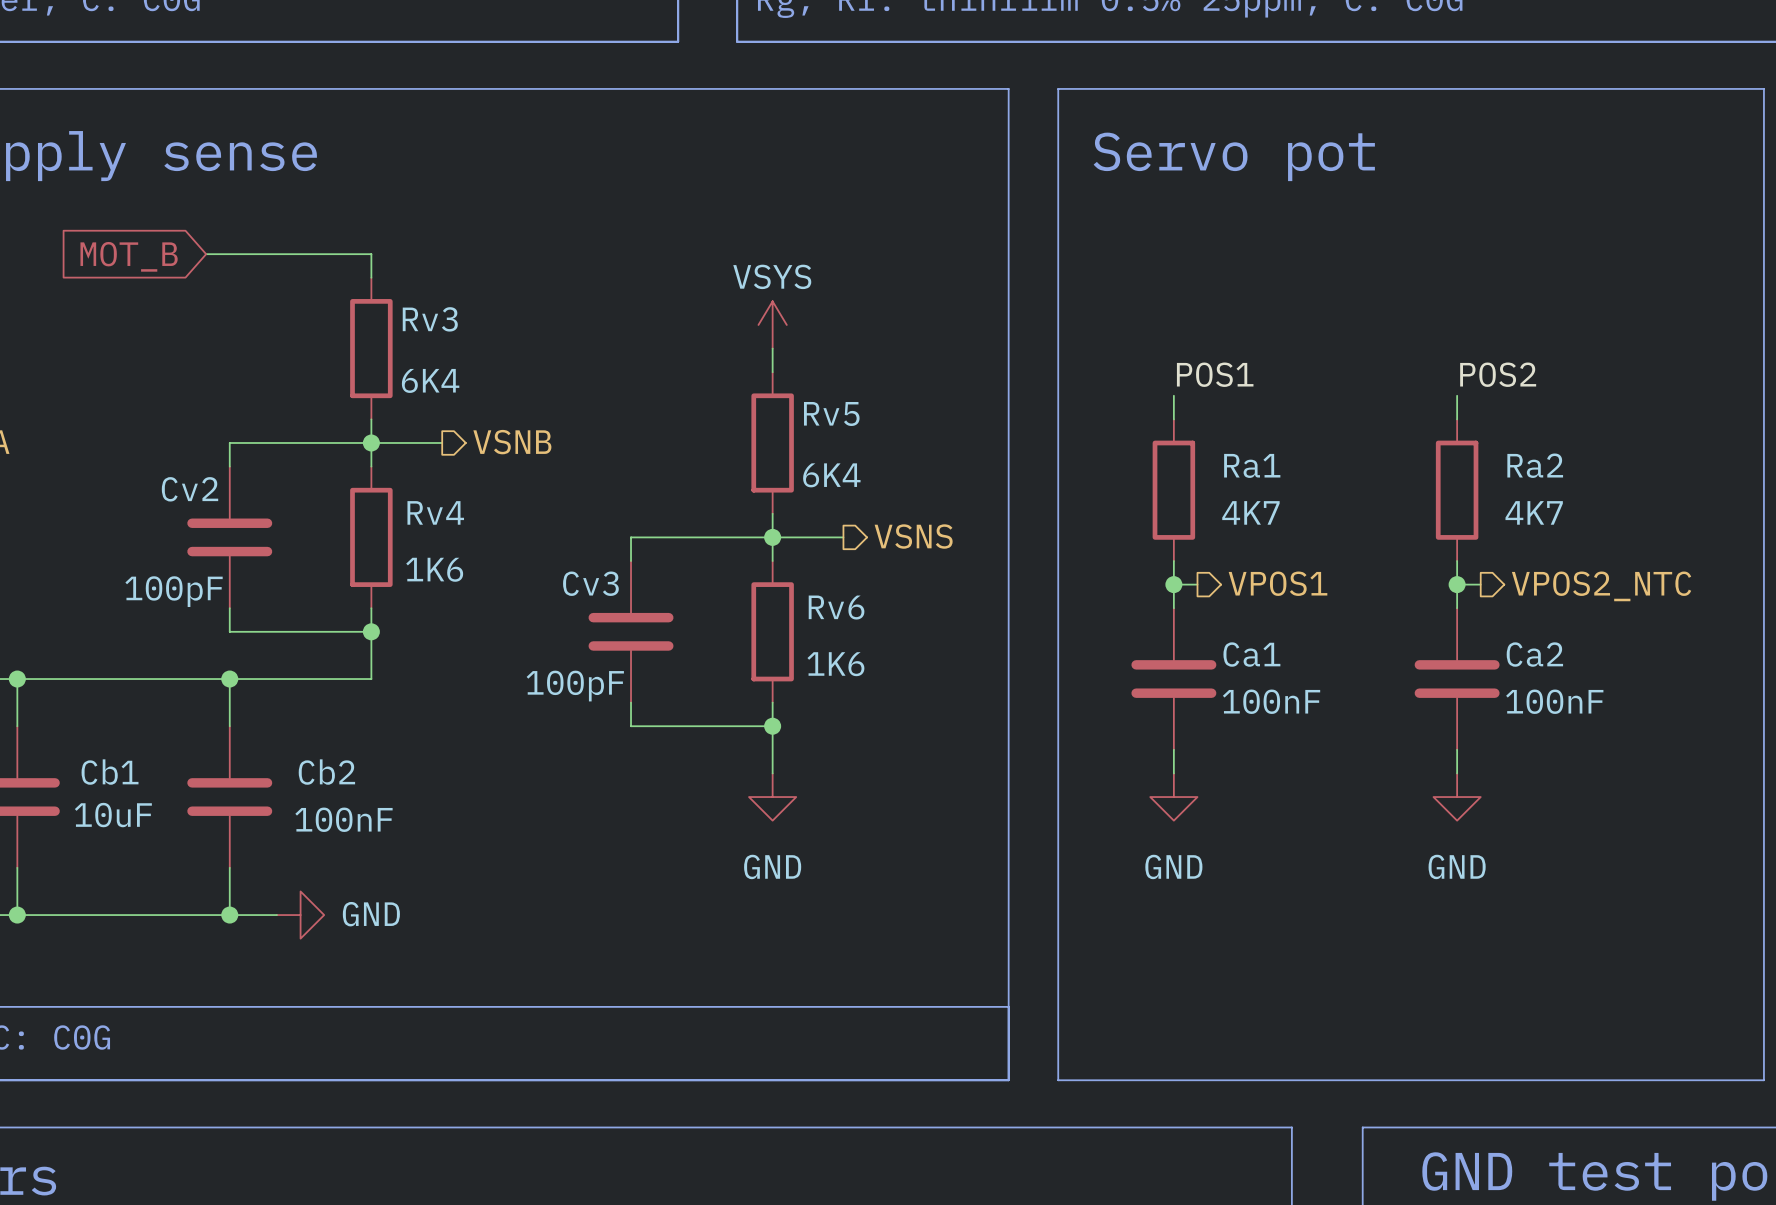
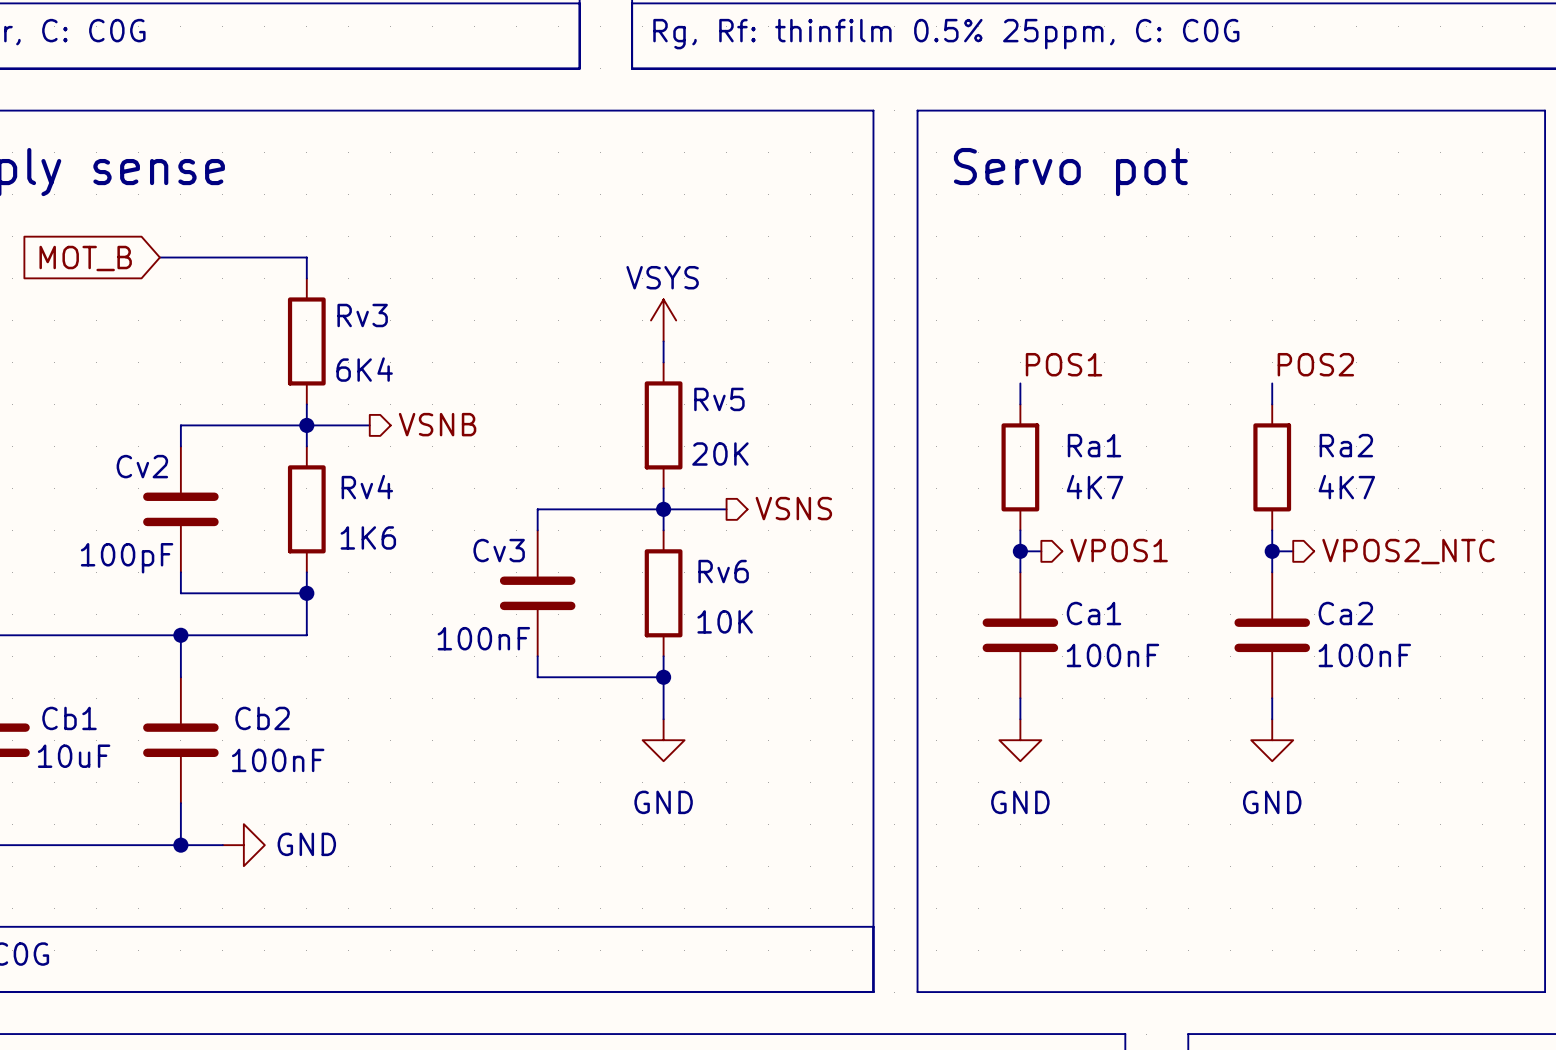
Rv5 value: 6K4 (831, 475) -> 20K (720, 454)
Rv6 value: 1K6 (835, 664) -> 10K (725, 621)
Cv3 value: 100pF (575, 686) -> 100nF (483, 638)

